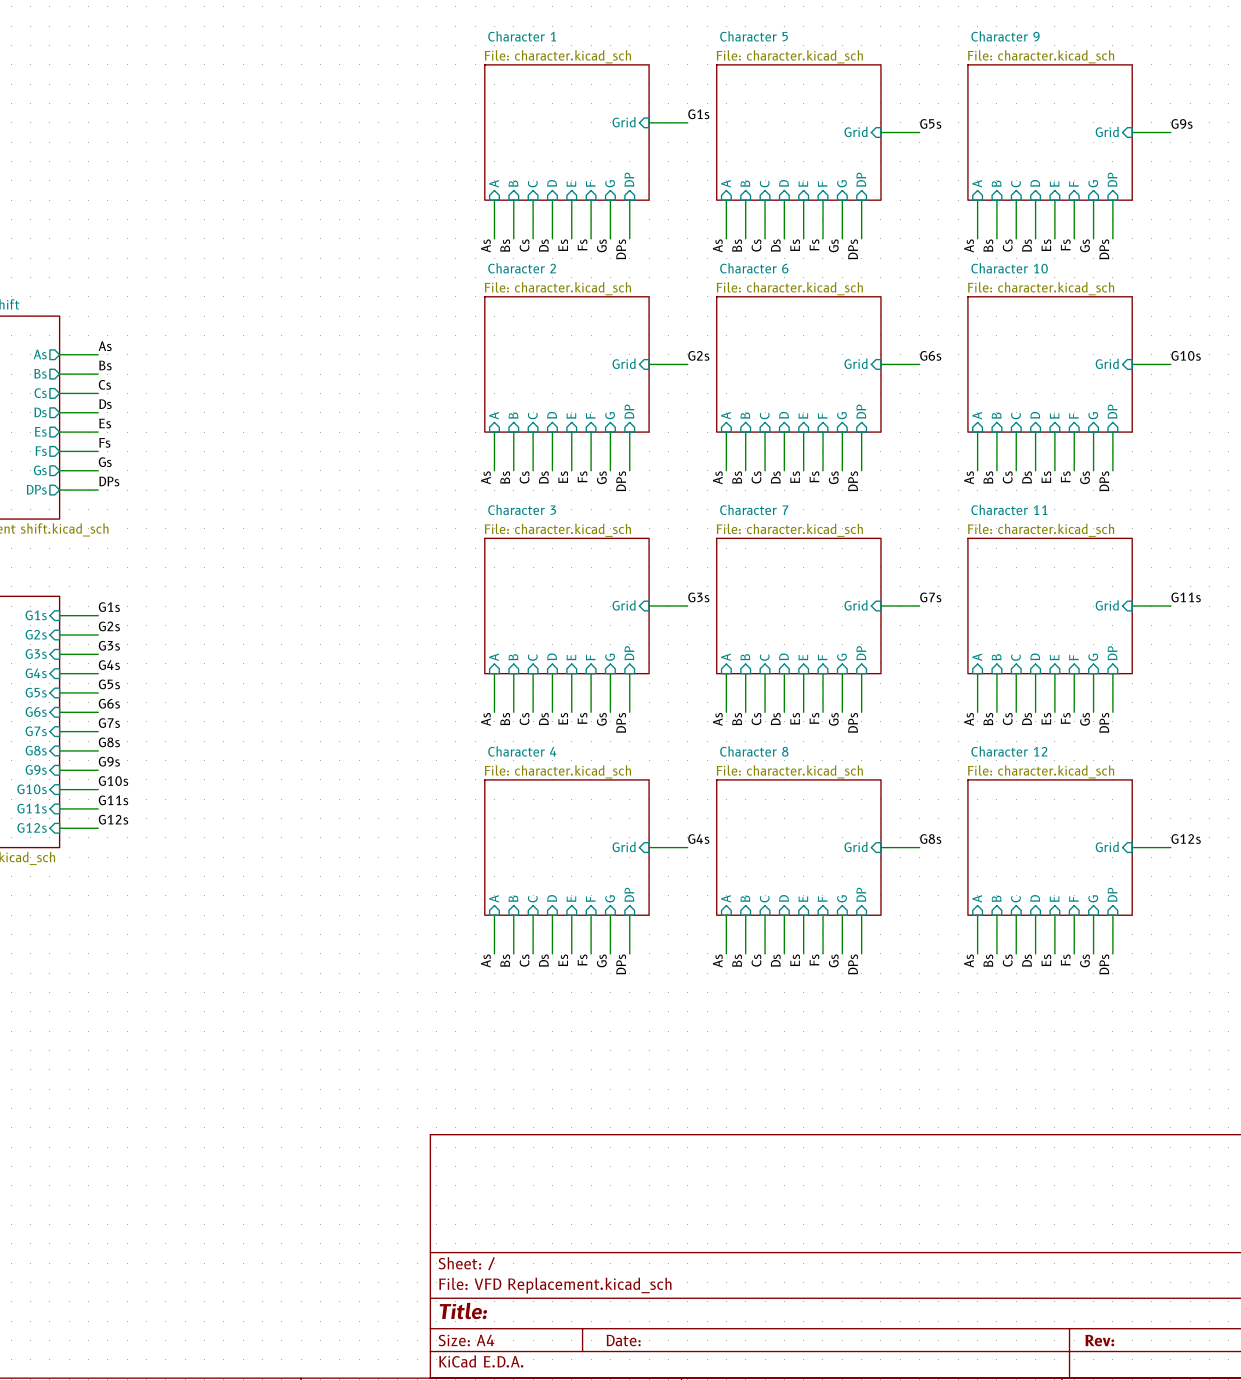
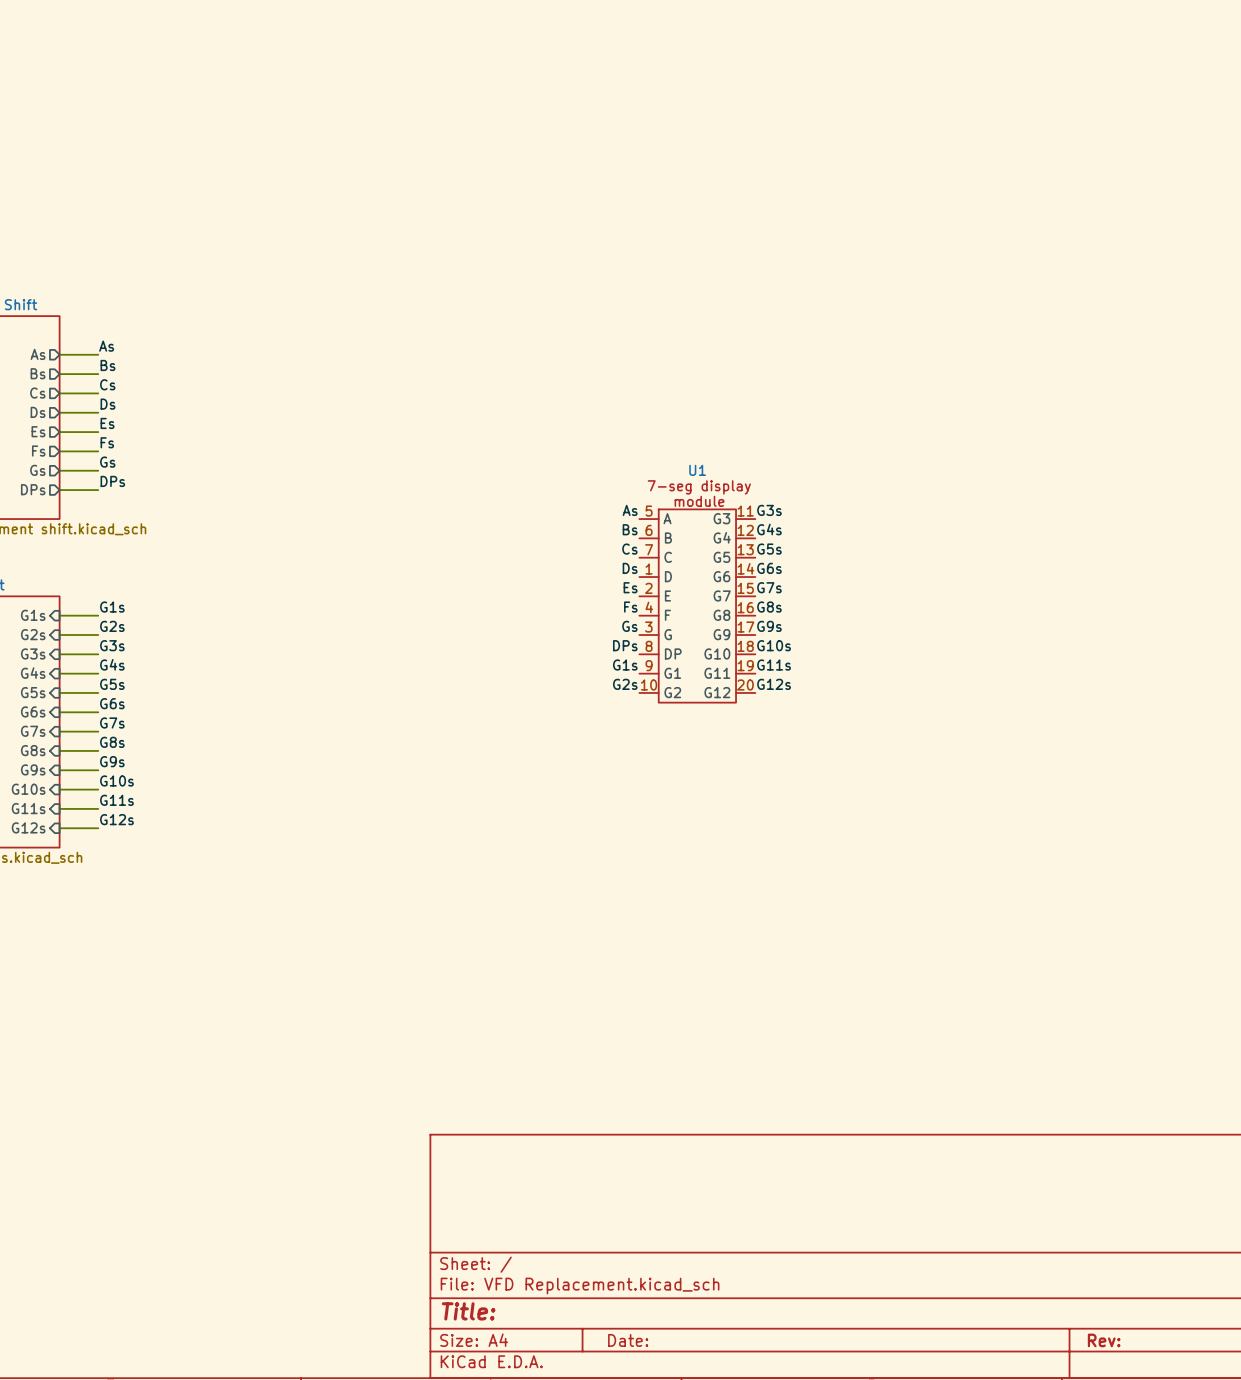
label: G1s (698, 114) -> none
sheet pin: Grid (624, 122) -> none
wire: (649, 122) (687, 122) -> none
label: G5s (930, 123) -> none
label: G9s (1181, 123) -> none
sheet pin: Grid (856, 131) -> none
sheet pin: Grid (1107, 131) -> none
sheet Character 1: File: character.kicad_sch (566, 132) -> none
sheet Character 5: File: character.kicad_sch (798, 132) -> none
wire: (880, 132) (919, 132) -> none
sheet Character 9: File: character.kicad_sch (1050, 132) -> none
wire: (1132, 132) (1170, 132) -> none
sheet pin: DP (629, 179) -> none
sheet pin: DP (861, 179) -> none
sheet pin: DP (1112, 179) -> none
sheet pin: A (494, 183) -> none
sheet pin: B (513, 183) -> none
sheet pin: D (552, 183) -> none
sheet pin: G (610, 183) -> none
sheet pin: A (726, 183) -> none
sheet pin: B (745, 183) -> none
sheet pin: D (784, 183) -> none
sheet pin: G (842, 183) -> none
sheet pin: A (977, 183) -> none
sheet pin: B (996, 183) -> none
sheet pin: D (1035, 183) -> none
sheet pin: G (1093, 183) -> none
sheet pin: C (532, 184) -> none
sheet pin: E (571, 184) -> none
sheet pin: F (590, 184) -> none
sheet pin: C (764, 184) -> none
sheet pin: E (803, 184) -> none
sheet pin: F (822, 184) -> none
sheet pin: C (1015, 184) -> none
sheet pin: E (1054, 184) -> none
sheet pin: F (1073, 184) -> none
wire: (494, 200) (494, 238) -> none
wire: (513, 200) (513, 238) -> none
wire: (533, 200) (533, 238) -> none
wire: (552, 200) (552, 238) -> none
wire: (571, 200) (571, 238) -> none
wire: (591, 200) (591, 238) -> none
wire: (610, 200) (610, 238) -> none
wire: (629, 200) (629, 238) -> none
wire: (726, 200) (726, 238) -> none
wire: (745, 200) (745, 238) -> none
wire: (765, 200) (765, 238) -> none
wire: (784, 200) (784, 238) -> none
wire: (803, 200) (803, 238) -> none
wire: (822, 200) (822, 238) -> none
wire: (842, 200) (842, 238) -> none
wire: (861, 200) (861, 238) -> none
wire: (977, 200) (977, 238) -> none
wire: (996, 200) (996, 238) -> none
wire: (1016, 200) (1016, 238) -> none
wire: (1035, 200) (1035, 238) -> none
wire: (1054, 200) (1054, 238) -> none
wire: (1074, 200) (1074, 238) -> none
wire: (1093, 200) (1093, 238) -> none
wire: (1112, 200) (1112, 238) -> none
label: Fs (582, 244) -> none
label: Fs (814, 244) -> none
label: Fs (1065, 244) -> none
label: As (485, 245) -> none
label: Bs (505, 245) -> none
label: Cs (524, 245) -> none
label: Ds (543, 245) -> none
label: Es (563, 245) -> none
label: Gs (601, 245) -> none
label: As (717, 245) -> none
label: Bs (737, 245) -> none
label: Cs (756, 245) -> none
label: Ds (775, 245) -> none
label: Es (795, 245) -> none
label: Gs (833, 245) -> none
label: As (969, 245) -> none
label: Bs (988, 245) -> none
label: Cs (1007, 245) -> none
label: Ds (1027, 245) -> none
label: Es (1046, 245) -> none
label: Gs (1085, 245) -> none
label: DPs (621, 249) -> none
label: DPs (853, 249) -> none
label: DPs (1104, 249) -> none
label: G2s (698, 355) -> none
label: G6s (930, 355) -> none
label: G10s (1186, 355) -> none
sheet pin: Grid (624, 363) -> none
sheet pin: Grid (856, 363) -> none
sheet pin: Grid (1107, 363) -> none
sheet Character 2: File: character.kicad_sch (566, 364) -> none
wire: (649, 364) (687, 364) -> none
sheet Character 6: File: character.kicad_sch (798, 364) -> none
wire: (880, 364) (919, 364) -> none
sheet Character 10: File: character.kicad_sch (1050, 364) -> none
wire: (1132, 364) (1170, 364) -> none
sheet pin: DP (629, 411) -> none
sheet pin: DP (861, 411) -> none
sheet pin: DP (1112, 411) -> none
sheet pin: A (494, 415) -> none
sheet pin: B (513, 415) -> none
sheet pin: C (532, 415) -> none
sheet pin: D (552, 415) -> none
sheet pin: E (571, 415) -> none
sheet pin: F (590, 415) -> none
sheet pin: G (610, 415) -> none
sheet pin: A (726, 415) -> none
sheet pin: B (745, 415) -> none
sheet pin: C (764, 415) -> none
sheet pin: D (784, 415) -> none
sheet pin: E (803, 415) -> none
sheet pin: F (822, 415) -> none
sheet pin: G (842, 415) -> none
sheet pin: A (977, 415) -> none
sheet pin: B (996, 415) -> none
sheet pin: C (1015, 415) -> none
sheet pin: D (1035, 415) -> none
sheet pin: E (1054, 415) -> none
sheet pin: F (1073, 415) -> none
sheet pin: G (1093, 415) -> none
wire: (494, 432) (494, 470) -> none
wire: (513, 432) (513, 470) -> none
wire: (533, 432) (533, 470) -> none
wire: (552, 432) (552, 470) -> none
wire: (571, 432) (571, 470) -> none
wire: (591, 432) (591, 470) -> none
wire: (610, 432) (610, 470) -> none
wire: (629, 432) (629, 470) -> none
wire: (726, 432) (726, 470) -> none
wire: (745, 432) (745, 470) -> none
wire: (765, 432) (765, 470) -> none
wire: (784, 432) (784, 470) -> none
wire: (803, 432) (803, 470) -> none
wire: (822, 432) (822, 470) -> none
wire: (842, 432) (842, 470) -> none
wire: (861, 432) (861, 470) -> none
wire: (977, 432) (977, 470) -> none
wire: (996, 432) (996, 470) -> none
wire: (1016, 432) (1016, 470) -> none
wire: (1035, 432) (1035, 470) -> none
wire: (1054, 432) (1054, 470) -> none
wire: (1074, 432) (1074, 470) -> none
wire: (1093, 432) (1093, 470) -> none
wire: (1112, 432) (1112, 470) -> none
label: Fs (582, 476) -> none
label: Fs (814, 476) -> none
label: Fs (1065, 476) -> none
label: As (485, 477) -> none
label: Bs (505, 477) -> none
label: Cs (524, 477) -> none
label: Ds (543, 477) -> none
label: Es (563, 477) -> none
label: Gs (601, 477) -> none
label: As (717, 477) -> none
label: Bs (737, 477) -> none
label: Cs (756, 477) -> none
label: Ds (775, 477) -> none
label: Es (795, 477) -> none
label: Gs (833, 477) -> none
label: As (969, 477) -> none
label: Bs (988, 477) -> none
label: Cs (1007, 477) -> none
label: Ds (1027, 477) -> none
label: Es (1046, 477) -> none
label: Gs (1085, 477) -> none
label: DPs (621, 481) -> none
label: DPs (853, 481) -> none
label: DPs (1104, 481) -> none
label: none -> As (630, 510)
label: none -> Bs (630, 529)
label: none -> G4s (769, 529)
label: none -> Cs (629, 549)
label: none -> G5s (769, 549)
label: none -> Ds (630, 568)
label: none -> G6s (769, 568)
label: none -> Es (630, 587)
label position: G3s (698, 597) -> G3s (769, 510)
label position: G7s (930, 597) -> G7s (769, 587)
label: G11s (1186, 597) -> none
sheet pin: Grid (624, 605) -> none
sheet pin: Grid (856, 605) -> none
sheet pin: Grid (1107, 605) -> none
sheet Character 3: File: character.kicad_sch (566, 606) -> none
wire: (649, 606) (687, 606) -> none
U1: none -> (697, 606)
sheet Character 7: File: character.kicad_sch (798, 606) -> none
wire: (880, 606) (919, 606) -> none
sheet Character 11: File: character.kicad_sch (1050, 606) -> none
wire: (1132, 606) (1170, 606) -> none
label: none -> Fs (630, 607)
label: none -> G8s (769, 607)
label: none -> Gs (629, 626)
label: none -> G9s (769, 626)
label: none -> G10s (774, 645)
sheet pin: DP (629, 653) -> none
sheet pin: DP (861, 653) -> none
sheet pin: DP (1112, 653) -> none
sheet pin: D (552, 656) -> none
sheet pin: D (784, 656) -> none
sheet pin: D (1035, 656) -> none
sheet pin: A (494, 657) -> none
sheet pin: B (513, 657) -> none
sheet pin: C (532, 657) -> none
sheet pin: E (571, 657) -> none
sheet pin: F (590, 657) -> none
sheet pin: G (610, 657) -> none
sheet pin: A (726, 657) -> none
sheet pin: B (745, 657) -> none
sheet pin: C (764, 657) -> none
sheet pin: E (803, 657) -> none
sheet pin: F (822, 657) -> none
sheet pin: G (842, 657) -> none
sheet pin: A (977, 657) -> none
sheet pin: B (996, 657) -> none
sheet pin: C (1015, 657) -> none
sheet pin: E (1054, 657) -> none
sheet pin: F (1073, 657) -> none
sheet pin: G (1093, 657) -> none
label: none -> G1s (625, 665)
label: none -> G11s (774, 665)
wire: (494, 673) (494, 712) -> none
wire: (513, 673) (513, 712) -> none
wire: (533, 673) (533, 712) -> none
wire: (552, 673) (552, 712) -> none
wire: (571, 673) (571, 712) -> none
wire: (591, 673) (591, 712) -> none
wire: (610, 673) (610, 712) -> none
wire: (629, 673) (629, 712) -> none
wire: (726, 673) (726, 712) -> none
wire: (745, 673) (745, 712) -> none
wire: (765, 673) (765, 712) -> none
wire: (784, 673) (784, 712) -> none
wire: (803, 673) (803, 712) -> none
wire: (822, 673) (822, 712) -> none
wire: (842, 673) (842, 712) -> none
wire: (861, 673) (861, 712) -> none
wire: (977, 673) (977, 712) -> none
wire: (996, 673) (996, 712) -> none
wire: (1016, 673) (1016, 712) -> none
wire: (1035, 673) (1035, 712) -> none
wire: (1054, 673) (1054, 712) -> none
wire: (1074, 673) (1074, 712) -> none
wire: (1093, 673) (1093, 712) -> none
wire: (1112, 673) (1112, 712) -> none
label: none -> G2s (625, 684)
label: none -> G12s (774, 684)
label: Es (563, 718) -> none
label: Fs (582, 718) -> none
label: Es (795, 718) -> none
label: Fs (814, 718) -> none
label: Es (1046, 718) -> none
label: Fs (1065, 718) -> none
label: As (485, 719) -> none
label: Bs (505, 719) -> none
label: Cs (524, 719) -> none
label: Ds (543, 719) -> none
label: Gs (601, 719) -> none
label: As (717, 719) -> none
label: Bs (737, 719) -> none
label: Cs (756, 719) -> none
label: Ds (775, 719) -> none
label: Gs (833, 719) -> none
label: As (969, 719) -> none
label: Bs (988, 719) -> none
label: Cs (1007, 719) -> none
label: Ds (1027, 719) -> none
label: Gs (1085, 719) -> none
label rotation: 0° (621, 722) -> 90° clockwise (625, 645)
label position: DPs (621, 722) -> DPs (625, 645)
label: DPs (853, 722) -> none
label: DPs (1104, 722) -> none
label: G4s (698, 839) -> none
label: G8s (930, 839) -> none
label: G12s (1186, 839) -> none
sheet pin: Grid (624, 846) -> none
sheet pin: Grid (856, 846) -> none
sheet pin: Grid (1107, 846) -> none
sheet Character 4: File: character.kicad_sch (566, 847) -> none
wire: (649, 847) (687, 847) -> none
sheet Character 8: File: character.kicad_sch (798, 847) -> none
wire: (880, 847) (919, 847) -> none
sheet Character 12: File: character.kicad_sch (1050, 847) -> none
wire: (1132, 847) (1170, 847) -> none
sheet pin: DP (629, 894) -> none
sheet pin: DP (861, 894) -> none
sheet pin: DP (1112, 894) -> none
sheet pin: A (494, 898) -> none
sheet pin: B (513, 898) -> none
sheet pin: D (552, 898) -> none
sheet pin: G (610, 898) -> none
sheet pin: A (726, 898) -> none
sheet pin: B (745, 898) -> none
sheet pin: D (784, 898) -> none
sheet pin: G (842, 898) -> none
sheet pin: A (977, 898) -> none
sheet pin: B (996, 898) -> none
sheet pin: D (1035, 898) -> none
sheet pin: G (1093, 898) -> none
sheet pin: C (532, 899) -> none
sheet pin: E (571, 899) -> none
sheet pin: F (590, 899) -> none
sheet pin: C (764, 899) -> none
sheet pin: E (803, 899) -> none
sheet pin: F (822, 899) -> none
sheet pin: C (1015, 899) -> none
sheet pin: E (1054, 899) -> none
sheet pin: F (1073, 899) -> none
wire: (494, 915) (494, 953) -> none
wire: (513, 915) (513, 953) -> none
wire: (533, 915) (533, 953) -> none
wire: (552, 915) (552, 953) -> none
wire: (571, 915) (571, 953) -> none
wire: (591, 915) (591, 953) -> none
wire: (610, 915) (610, 953) -> none
wire: (629, 915) (629, 953) -> none
wire: (726, 915) (726, 953) -> none
wire: (745, 915) (745, 953) -> none
wire: (765, 915) (765, 953) -> none
wire: (784, 915) (784, 953) -> none
wire: (803, 915) (803, 953) -> none
wire: (822, 915) (822, 953) -> none
wire: (842, 915) (842, 953) -> none
wire: (861, 915) (861, 953) -> none
wire: (977, 915) (977, 953) -> none
wire: (996, 915) (996, 953) -> none
wire: (1016, 915) (1016, 953) -> none
wire: (1035, 915) (1035, 953) -> none
wire: (1054, 915) (1054, 953) -> none
wire: (1074, 915) (1074, 953) -> none
wire: (1093, 915) (1093, 953) -> none
wire: (1112, 915) (1112, 953) -> none
label: As (485, 960) -> none
label: Bs (505, 960) -> none
label: Cs (524, 960) -> none
label: Ds (543, 960) -> none
label: Es (563, 960) -> none
label: Fs (582, 960) -> none
label: Gs (601, 960) -> none
label: As (717, 960) -> none
label: Bs (737, 960) -> none
label: Cs (756, 960) -> none
label: Ds (775, 960) -> none
label: Es (795, 960) -> none
label: Fs (814, 960) -> none
label: Gs (833, 960) -> none
label: As (969, 960) -> none
label: Bs (988, 960) -> none
label: Cs (1007, 960) -> none
label: Ds (1027, 960) -> none
label: Es (1046, 960) -> none
label: Fs (1065, 960) -> none
label: Gs (1085, 960) -> none
label: DPs (621, 964) -> none
label: DPs (853, 964) -> none
label: DPs (1104, 964) -> none

